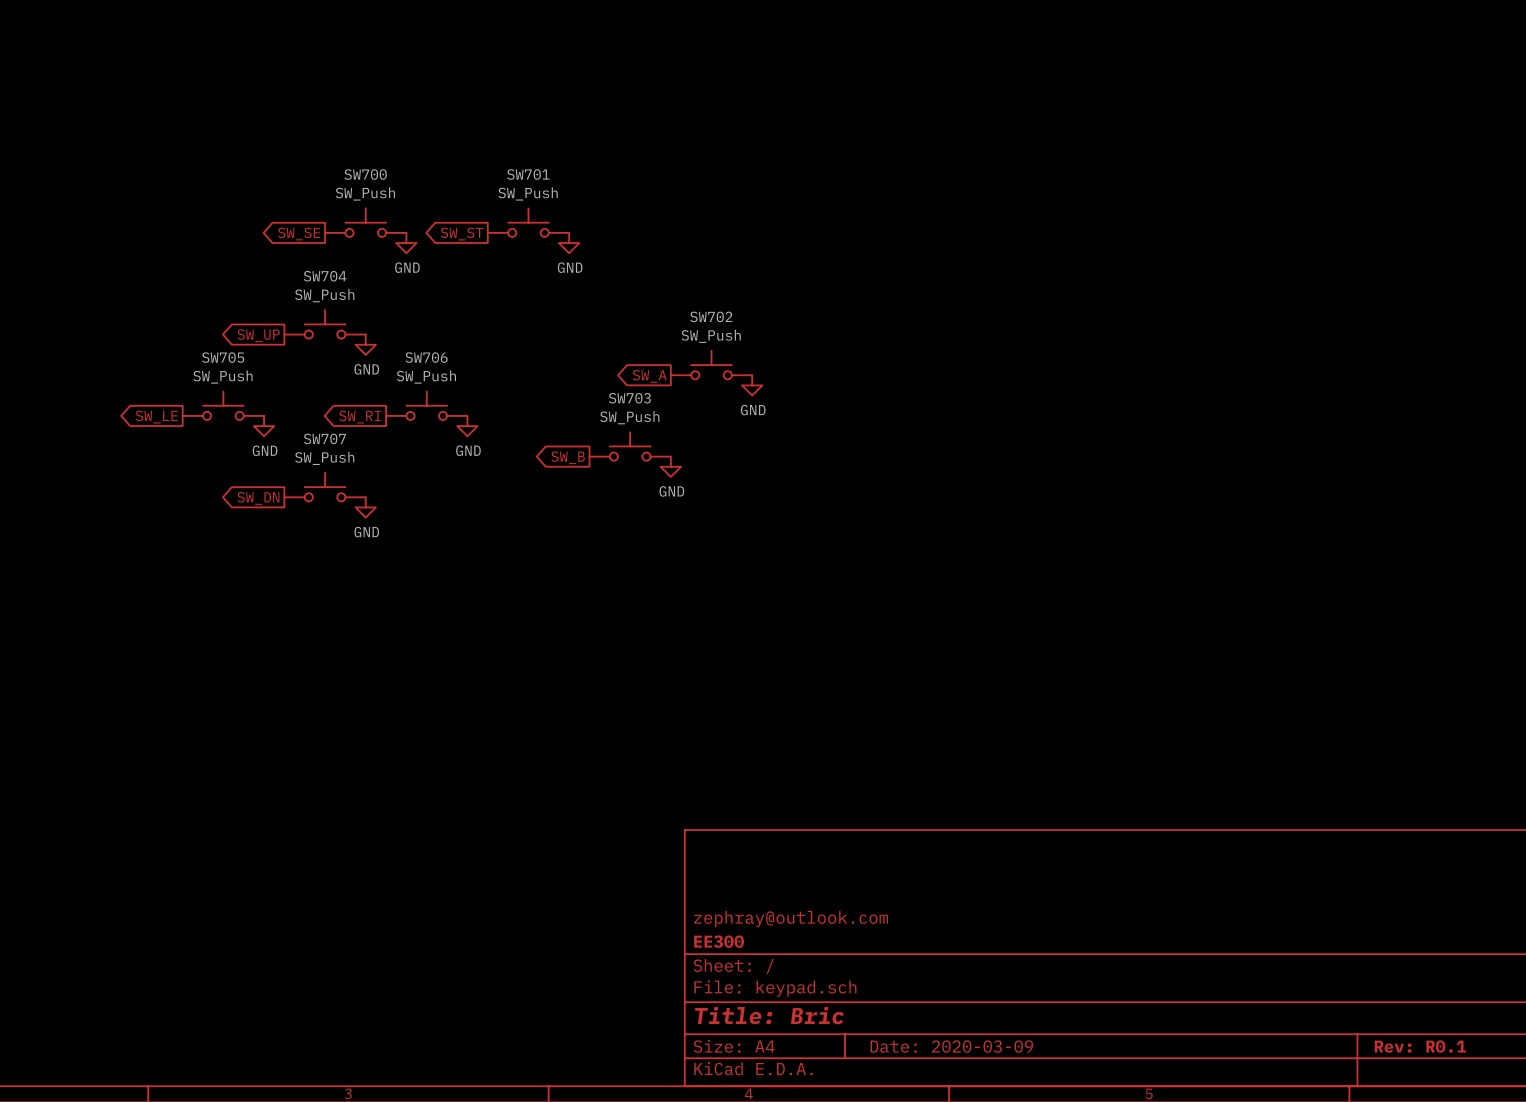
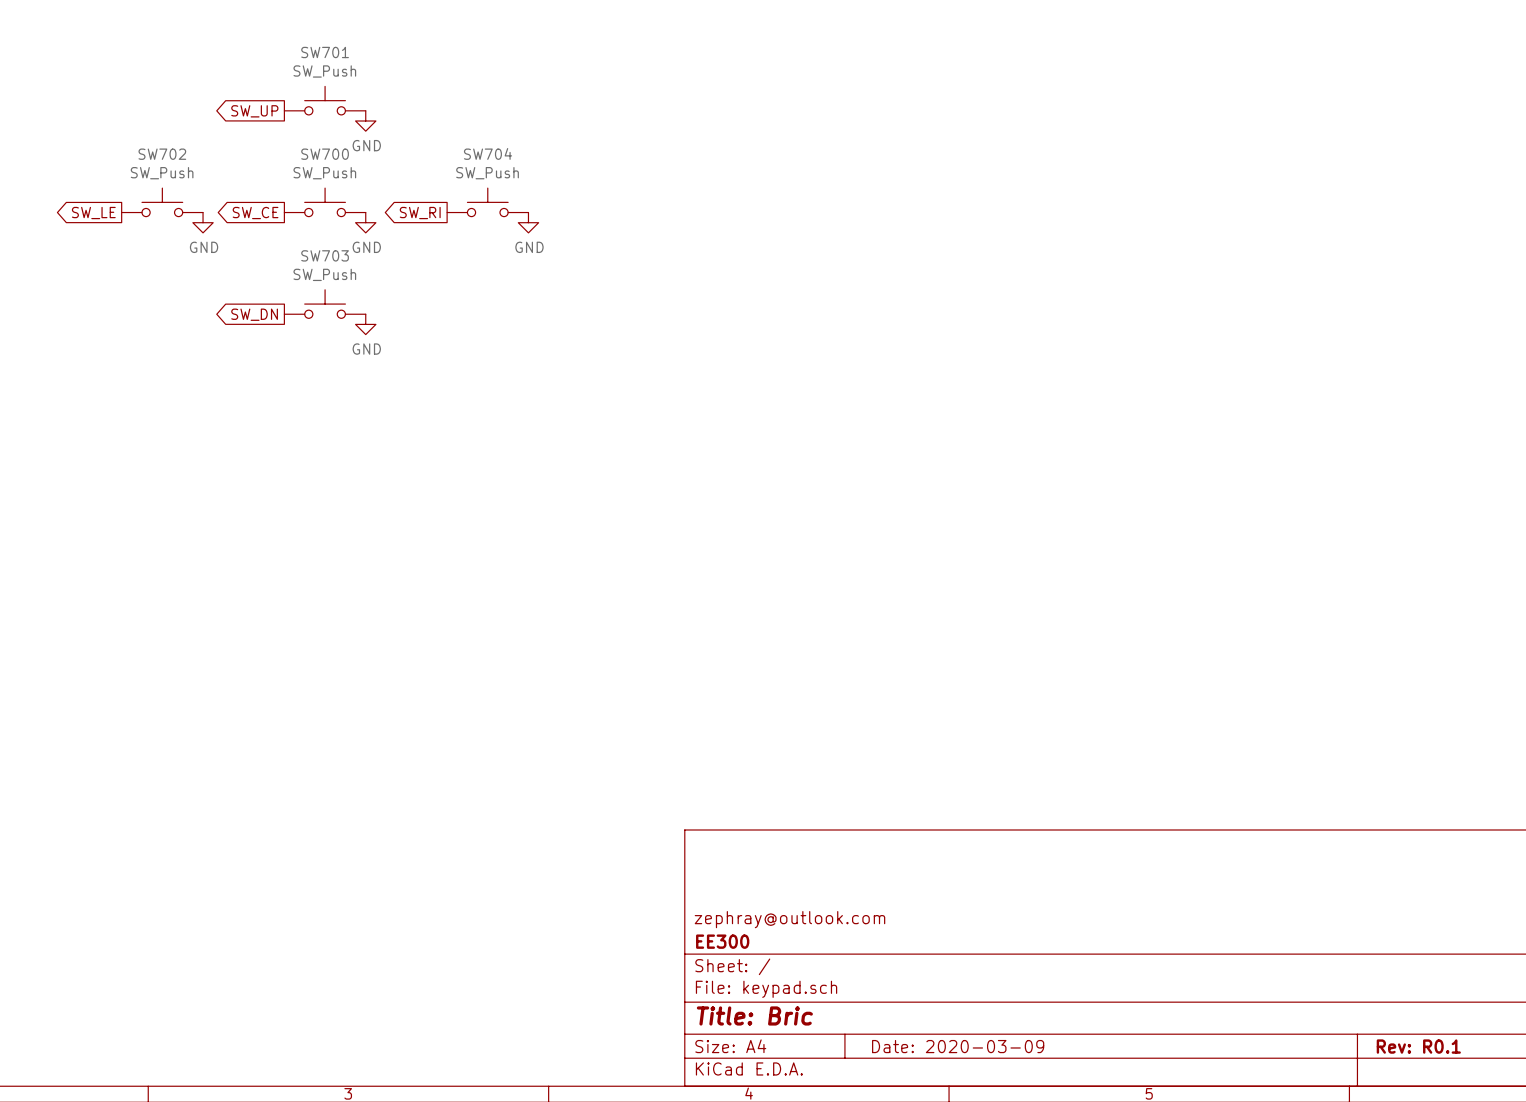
global label: none -> SW_UP (254, 111)
power symbol: none -> GND (365, 121)
global label: none -> SW_LE (93, 213)
global label: none -> SW_RI (420, 213)
power symbol: none -> GND (203, 222)
power symbol: none -> GND (365, 222)
SW700 position: (365, 222) -> (325, 202)
SW701 position: (528, 222) -> (325, 100)
global label: SW_SE (299, 234) -> SW_CE (255, 213)
global label: SW_ST (462, 234) -> none
power symbol: GND (406, 243) -> none
power symbol position: GND (569, 243) -> GND (528, 222)
SW704 position: (325, 324) -> (487, 202)
global label: SW_UP (258, 335) -> none
power symbol position: GND (365, 344) -> GND (365, 324)
SW702 position: (711, 365) -> (162, 202)
global label: SW_A (649, 376) -> none
power symbol: GND (752, 385) -> none
SW705: SW_Push (223, 405) -> none
SW706: SW_Push (426, 405) -> none
global label: SW_LE (156, 417) -> none
global label: SW_RI (360, 417) -> none
power symbol: GND (264, 426) -> none
power symbol: GND (467, 426) -> none
SW703 position: (630, 446) -> (325, 304)
global label: SW_B (568, 457) -> none
power symbol: GND (670, 466) -> none
SW707: SW_Push (325, 487) -> none
global label position: SW_DN (258, 498) -> SW_DN (254, 314)
power symbol: GND (365, 507) -> none

